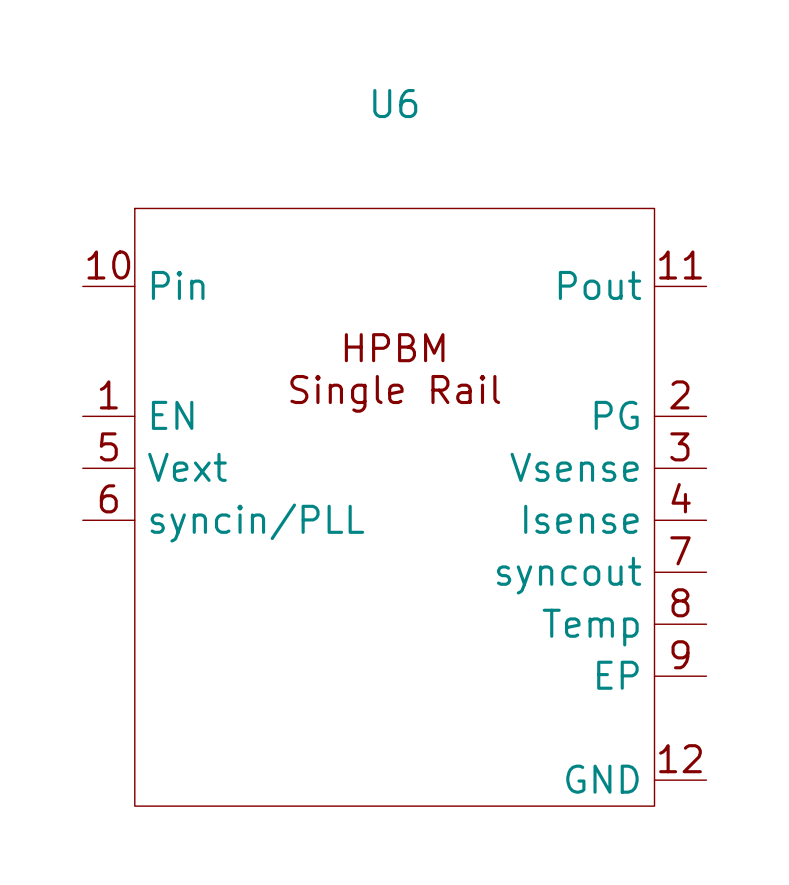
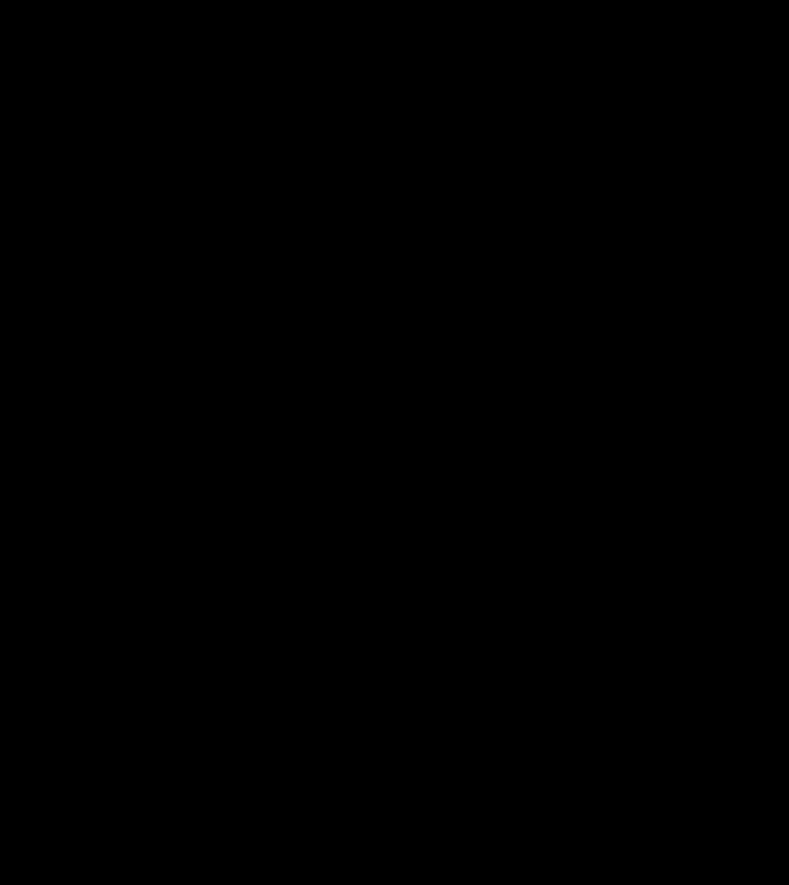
U6: (394, 507) -> none

